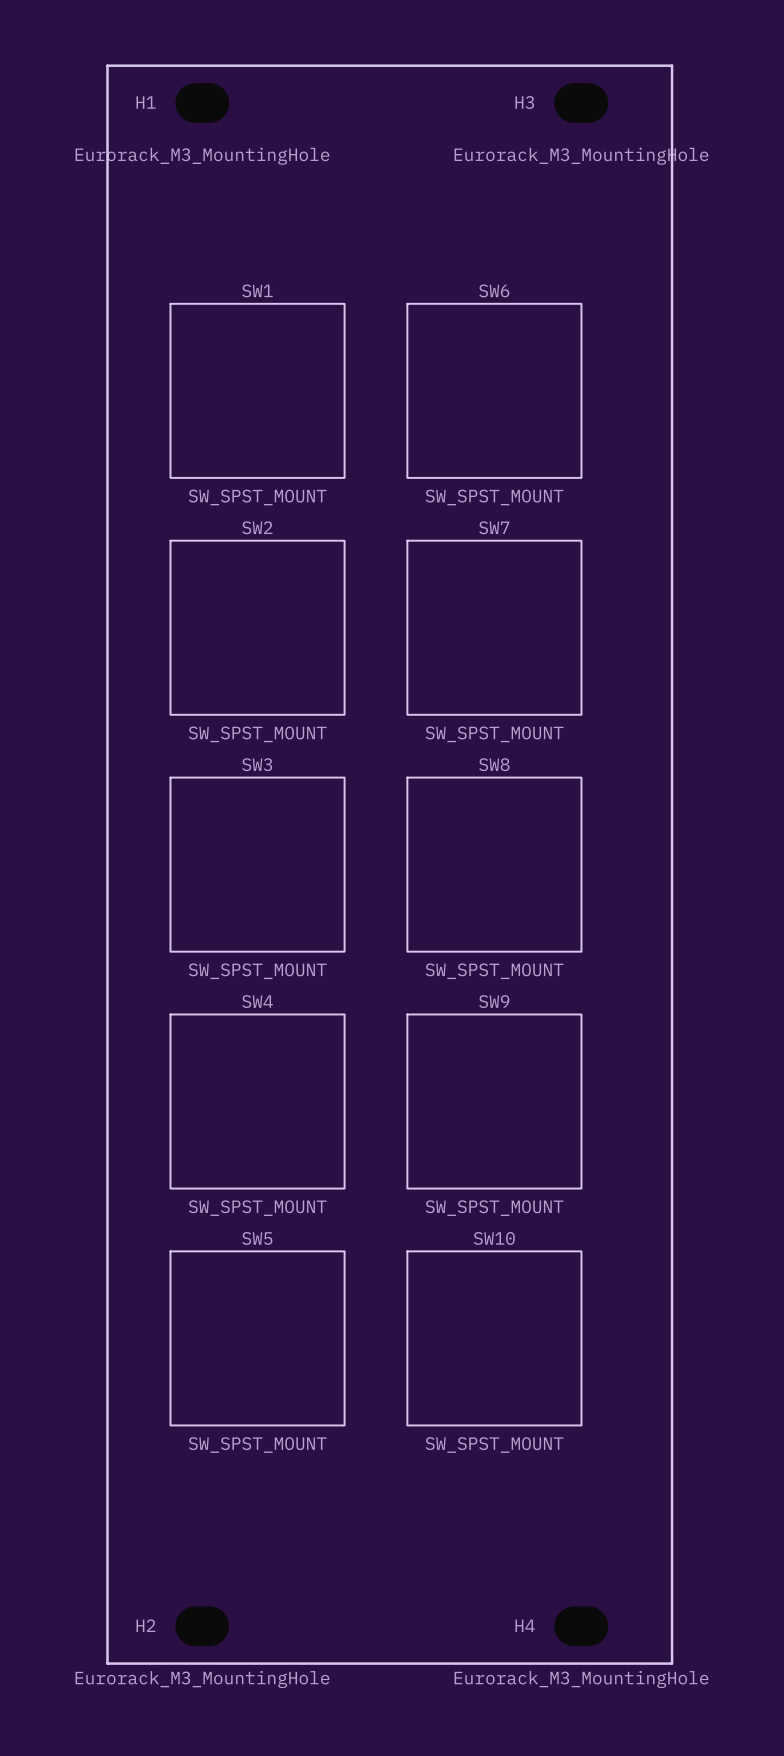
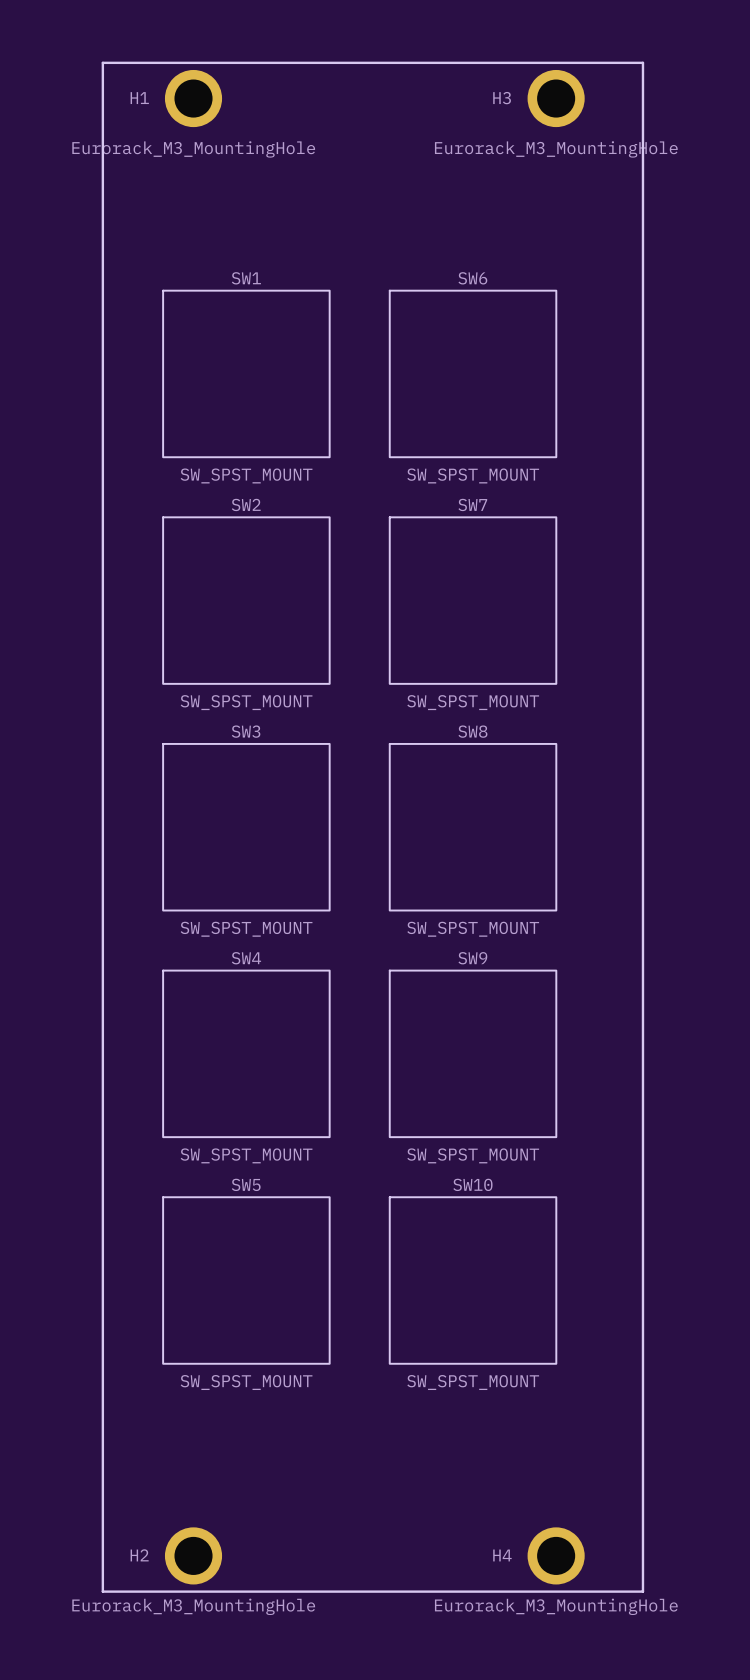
H1 footprint: [175, 83, 230, 123] -> [164, 69, 223, 128]
H3 footprint: [554, 83, 609, 123] -> [527, 69, 585, 128]
H2 footprint: [175, 1606, 230, 1647] -> [164, 1527, 223, 1585]
H4 footprint: [554, 1606, 609, 1647] -> [527, 1527, 585, 1585]

